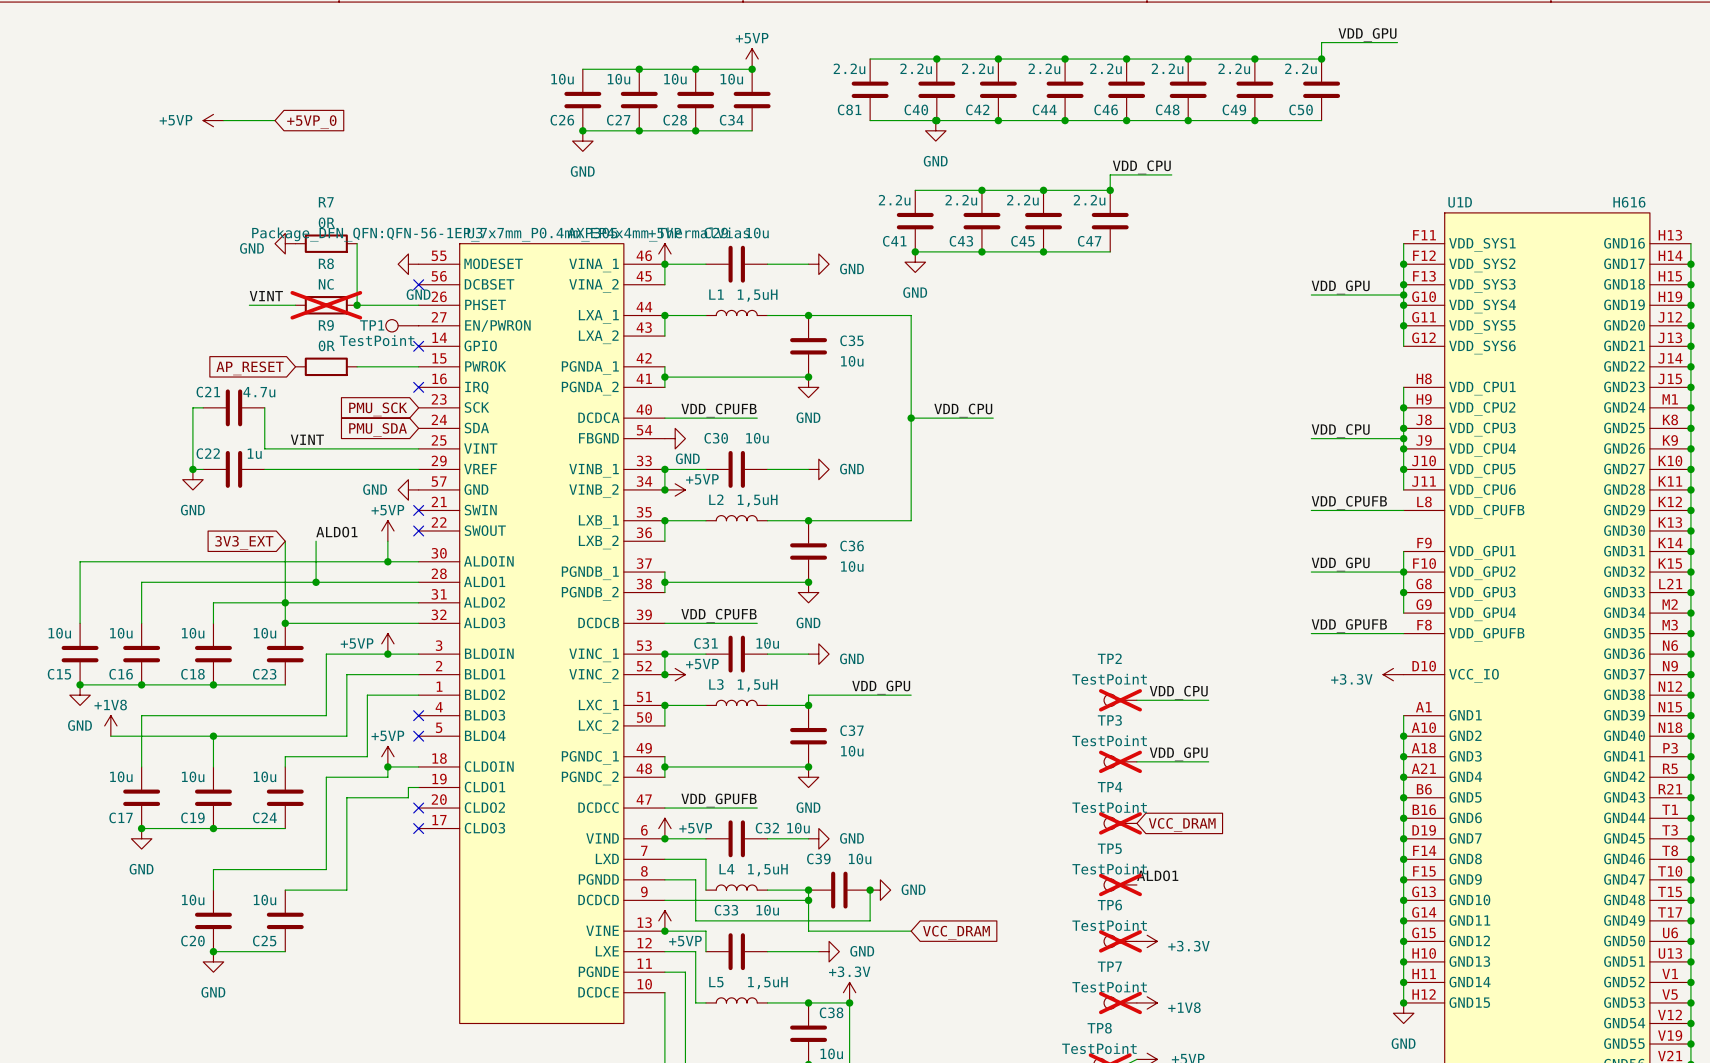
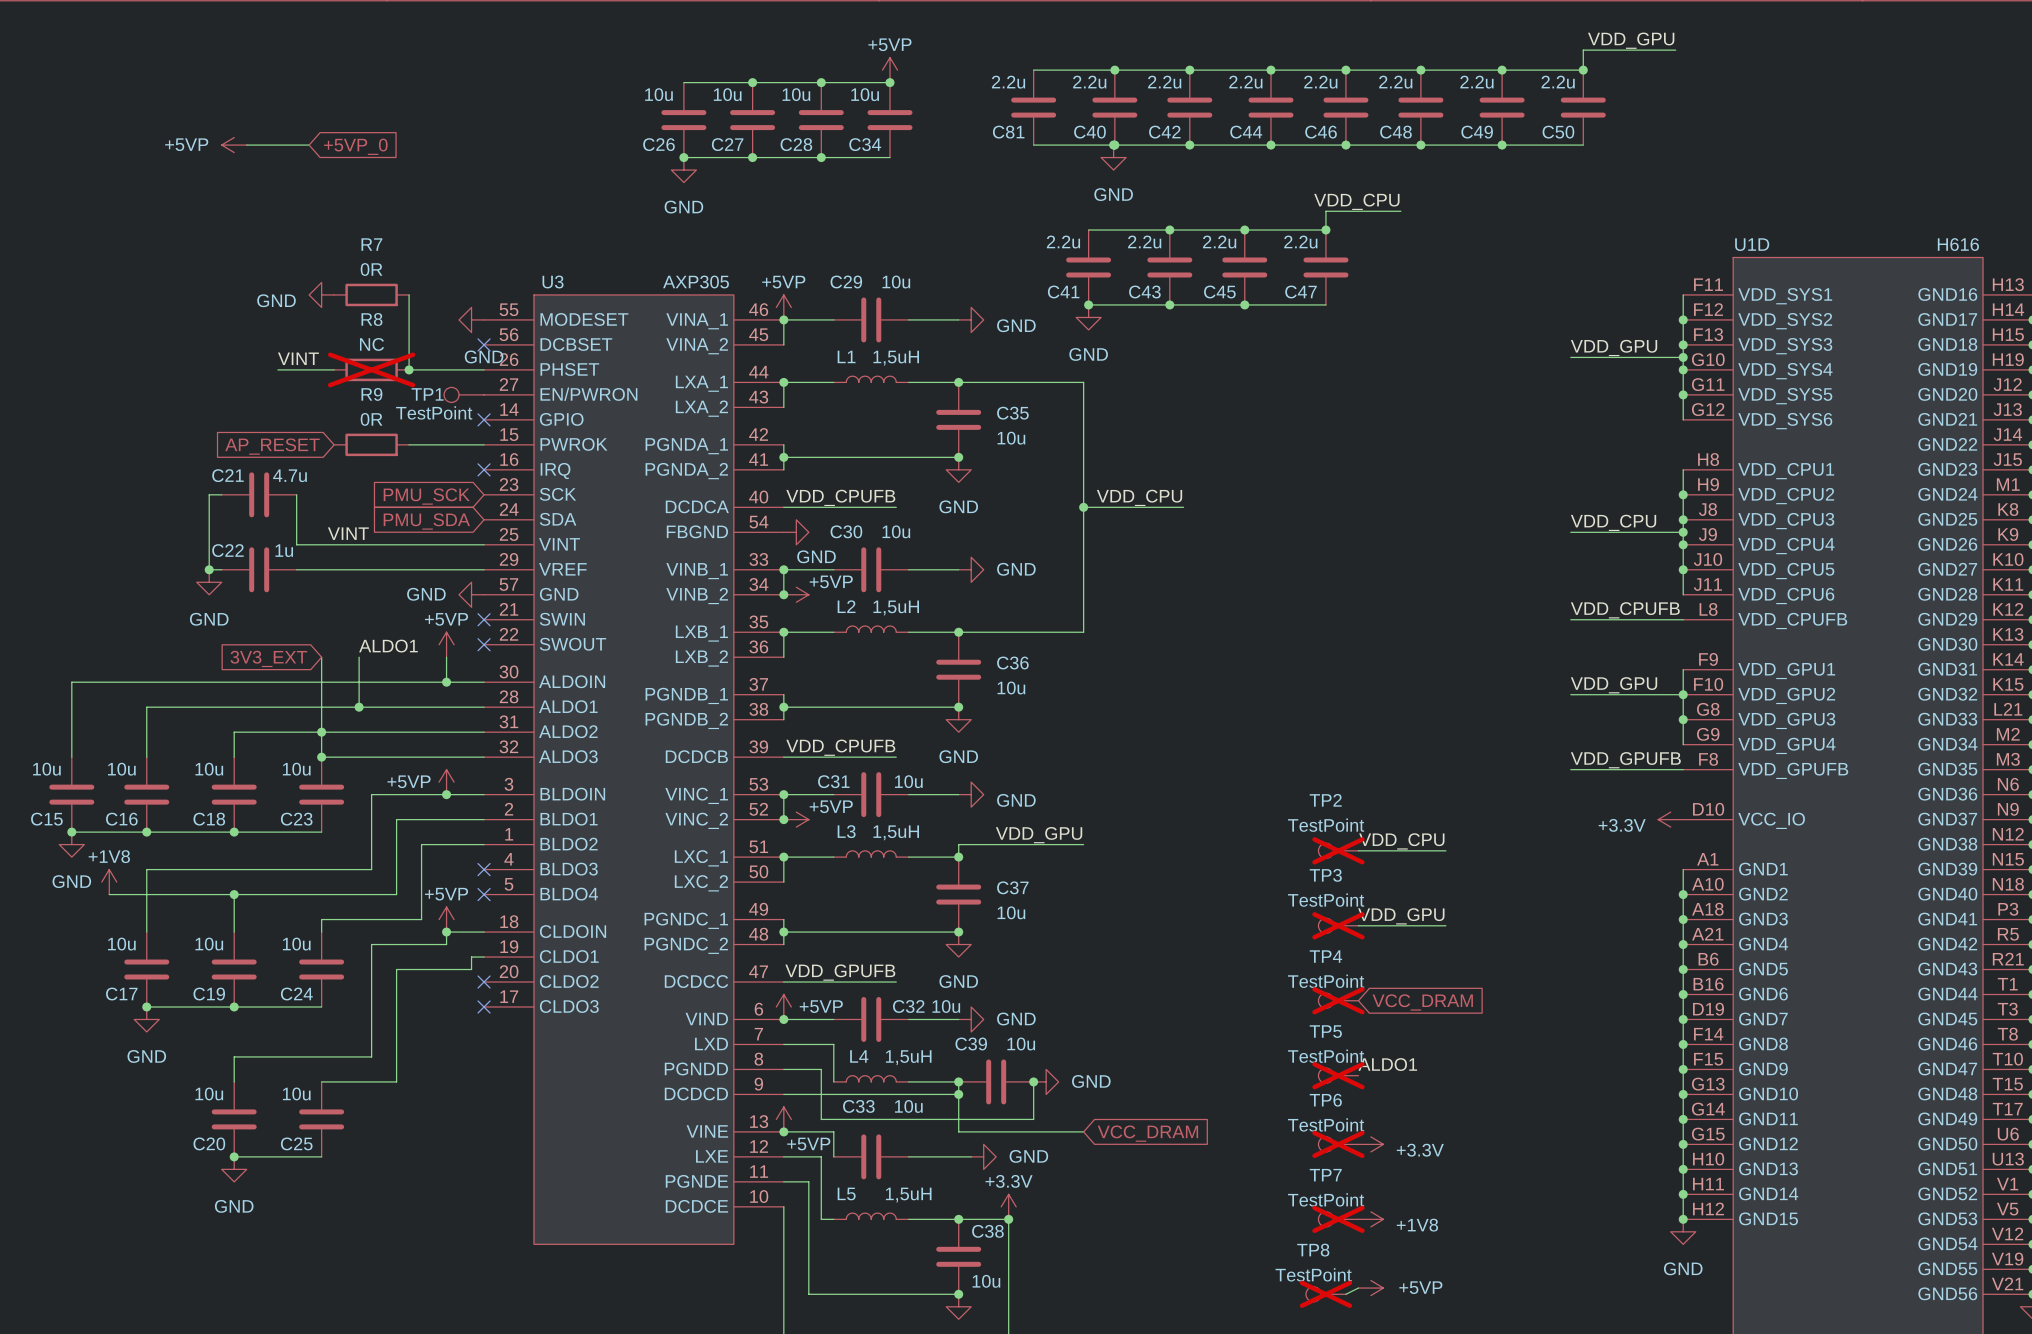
U3 text: Package_DFN_QFN:QFN-56-1EP_7x7mm_P0.4mm_EP4x4mm_ThermalVias (500, 234) -> none

